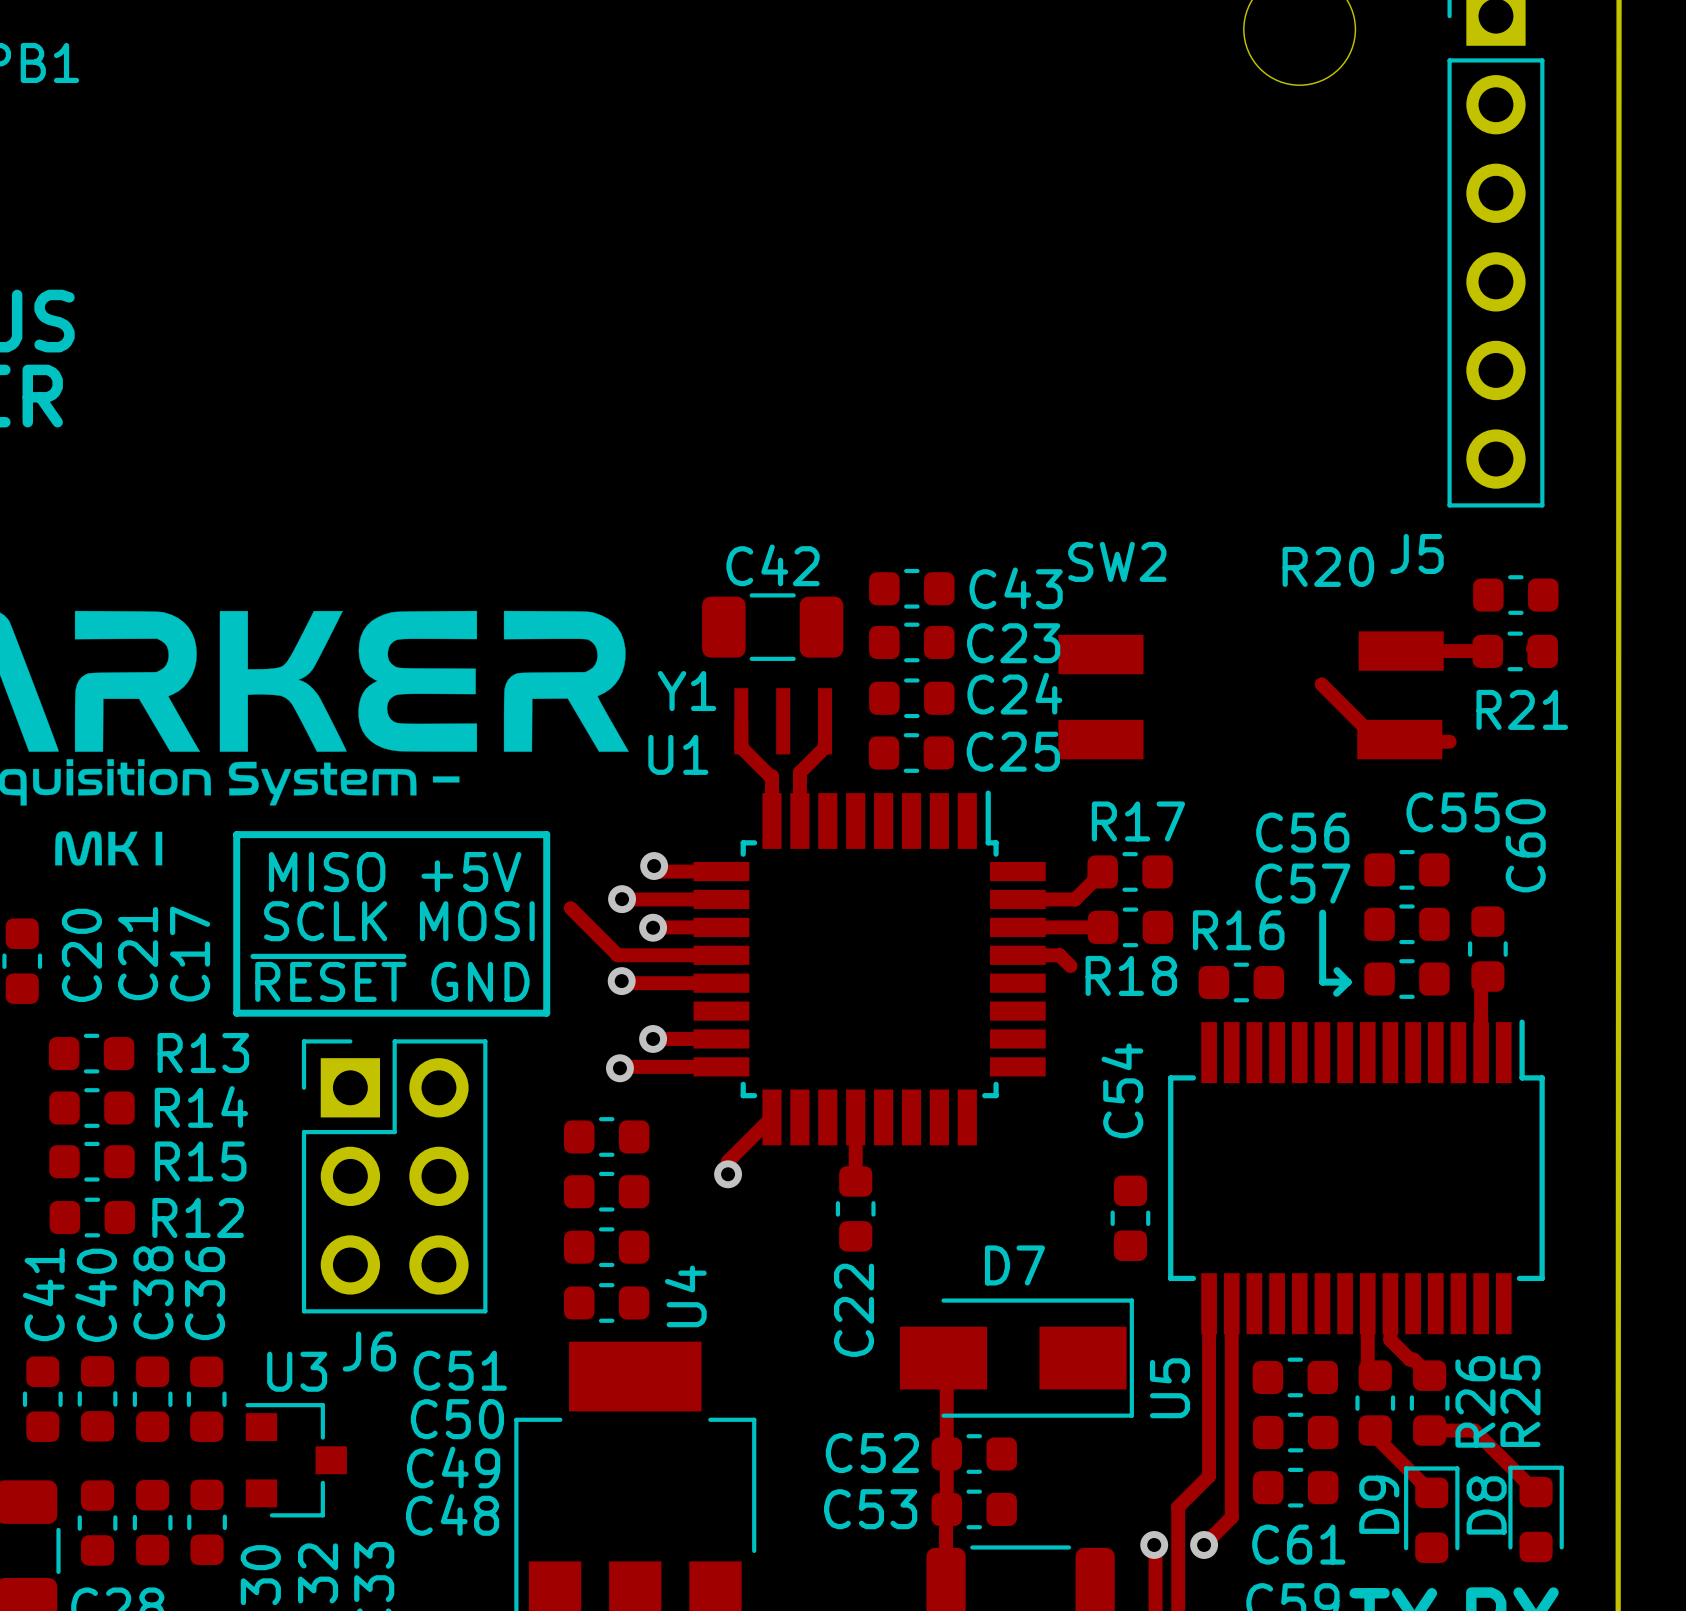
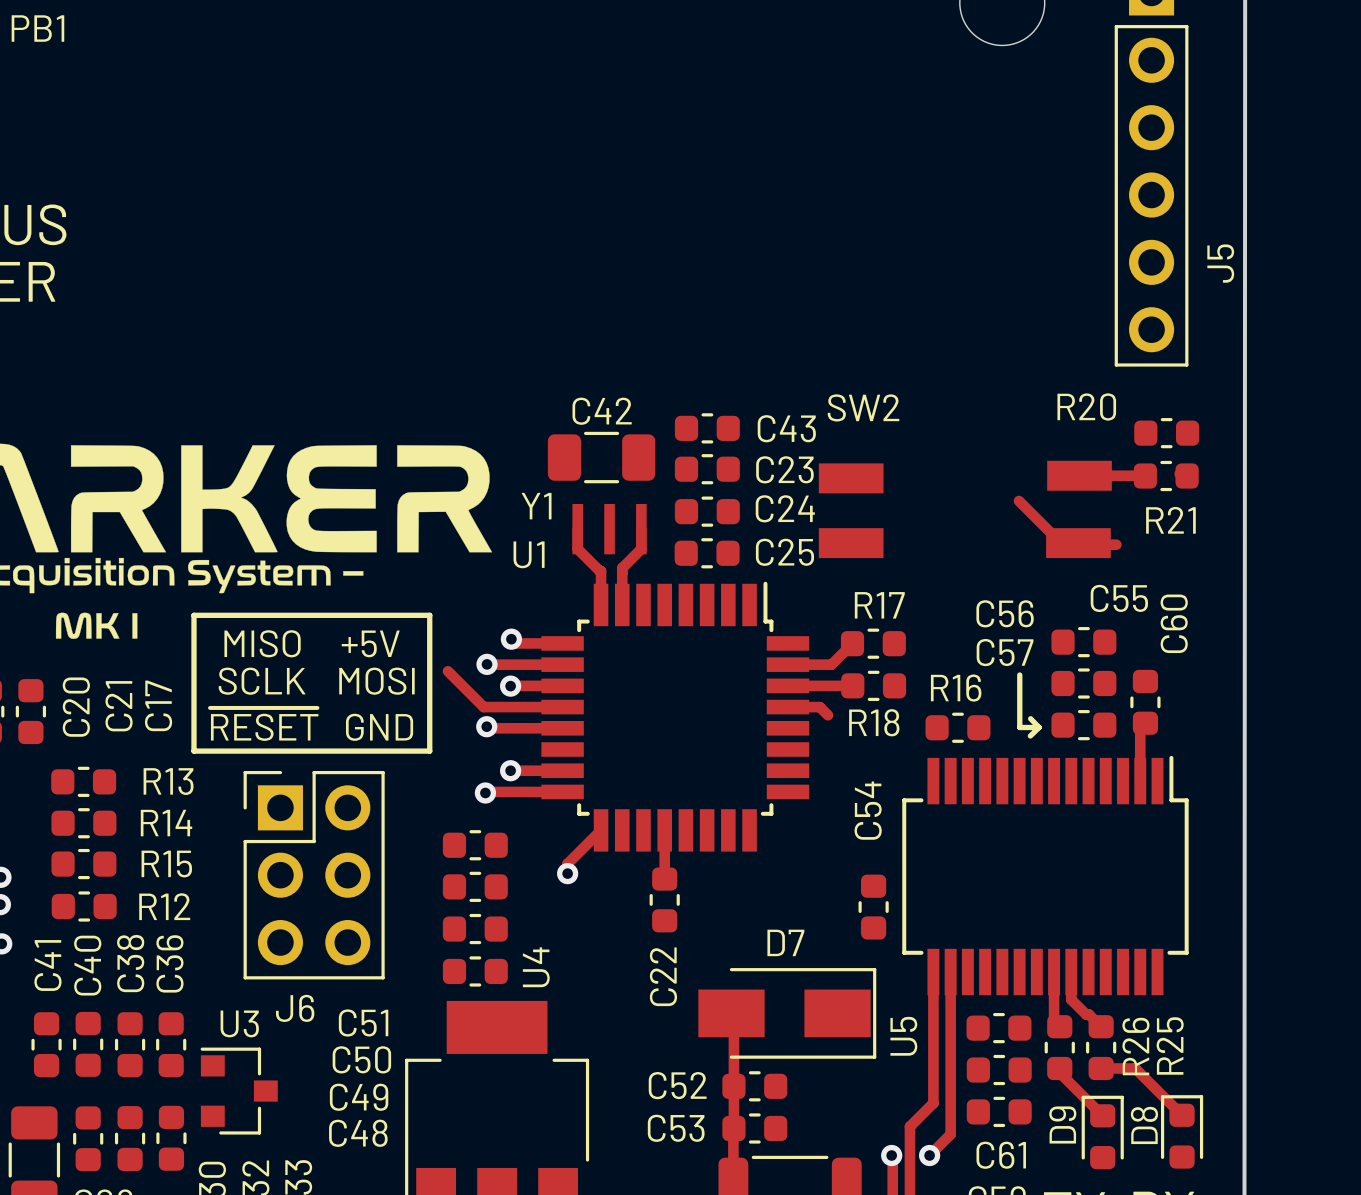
J5 name rotation: 0° (1417, 553) -> 90° counterclockwise (1220, 263)
J5 name position: J5 (1417, 553) -> J5 (1220, 263)
R20 name position: R20 (1328, 566) -> R20 (1086, 406)

